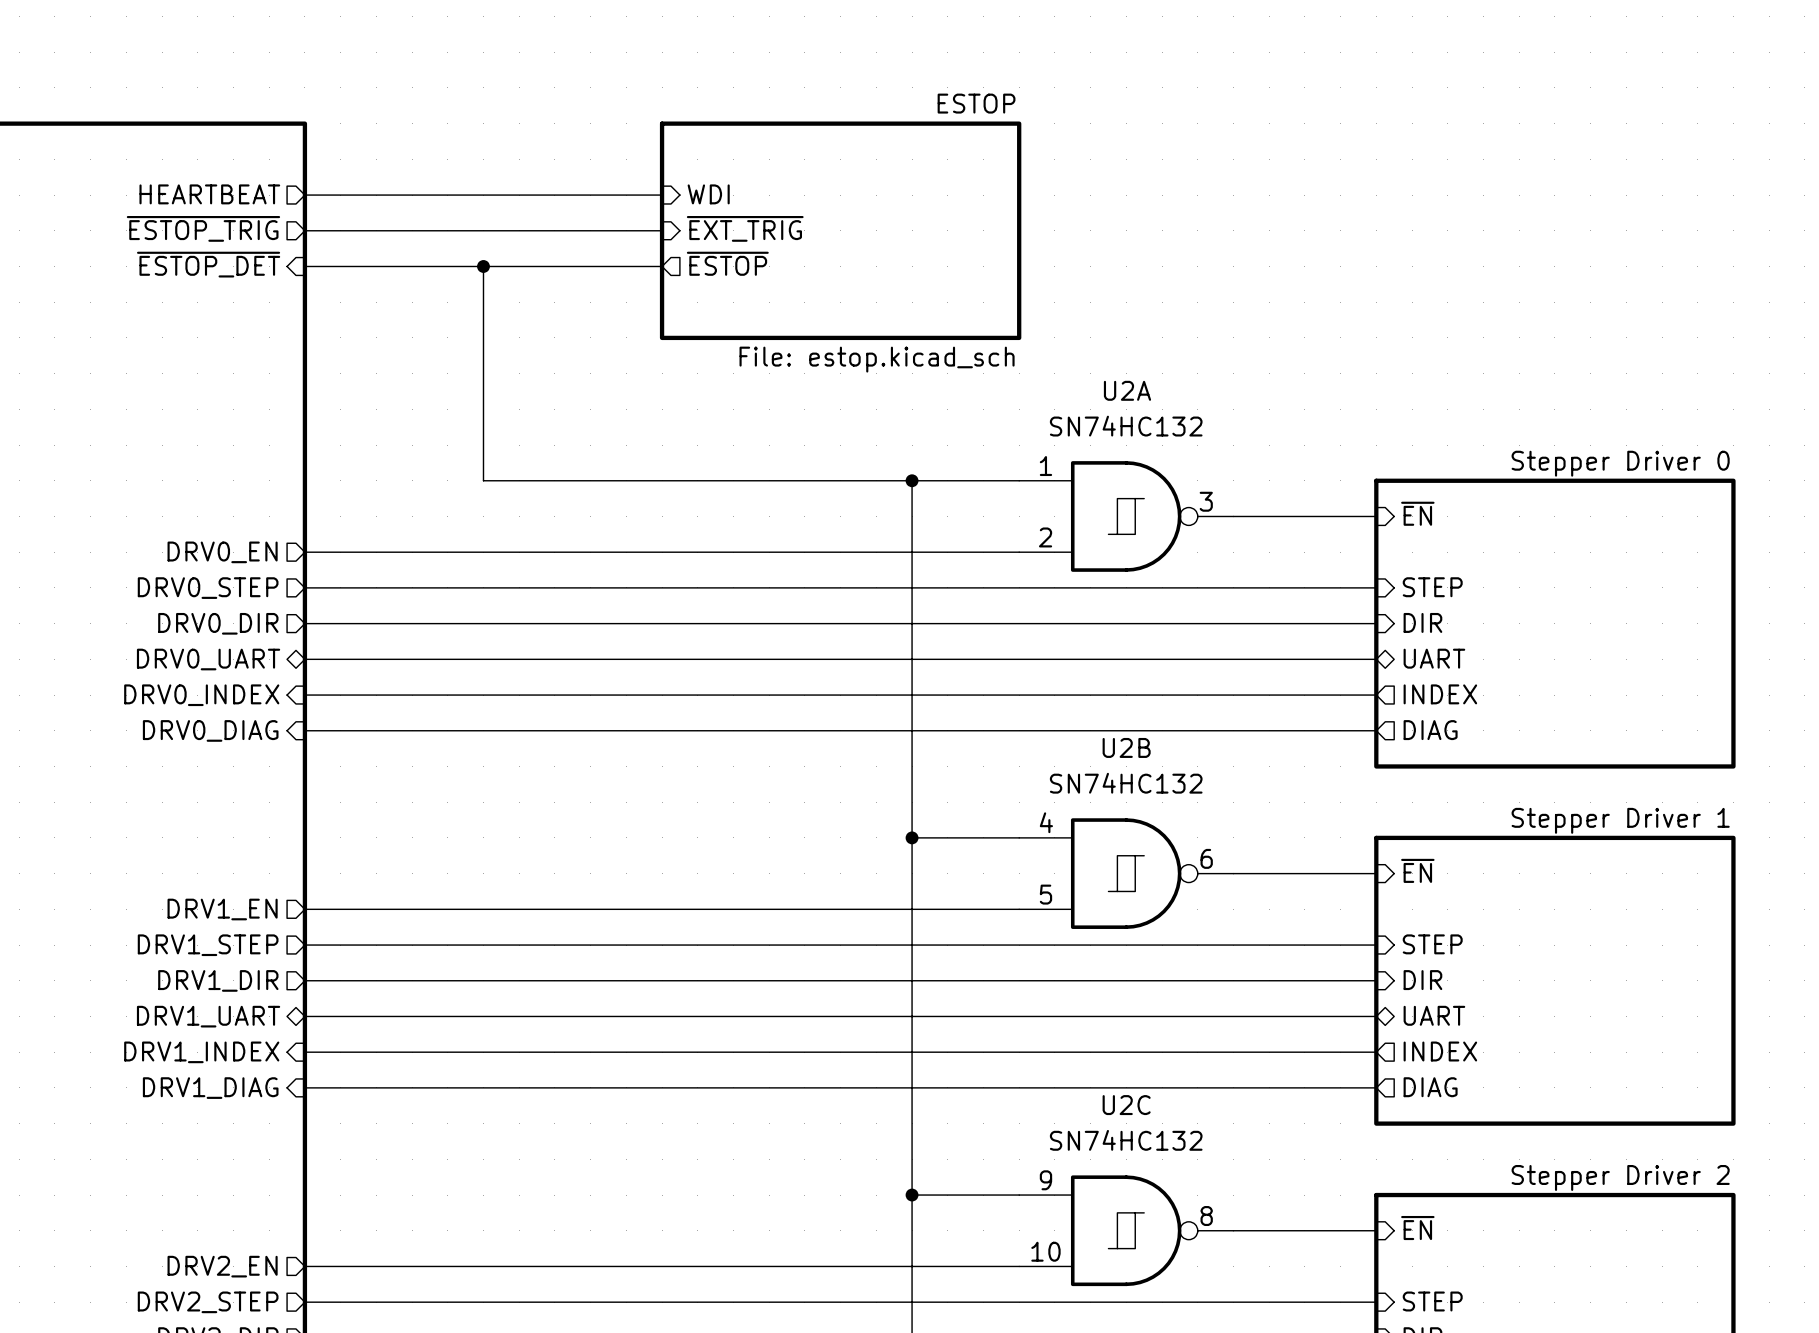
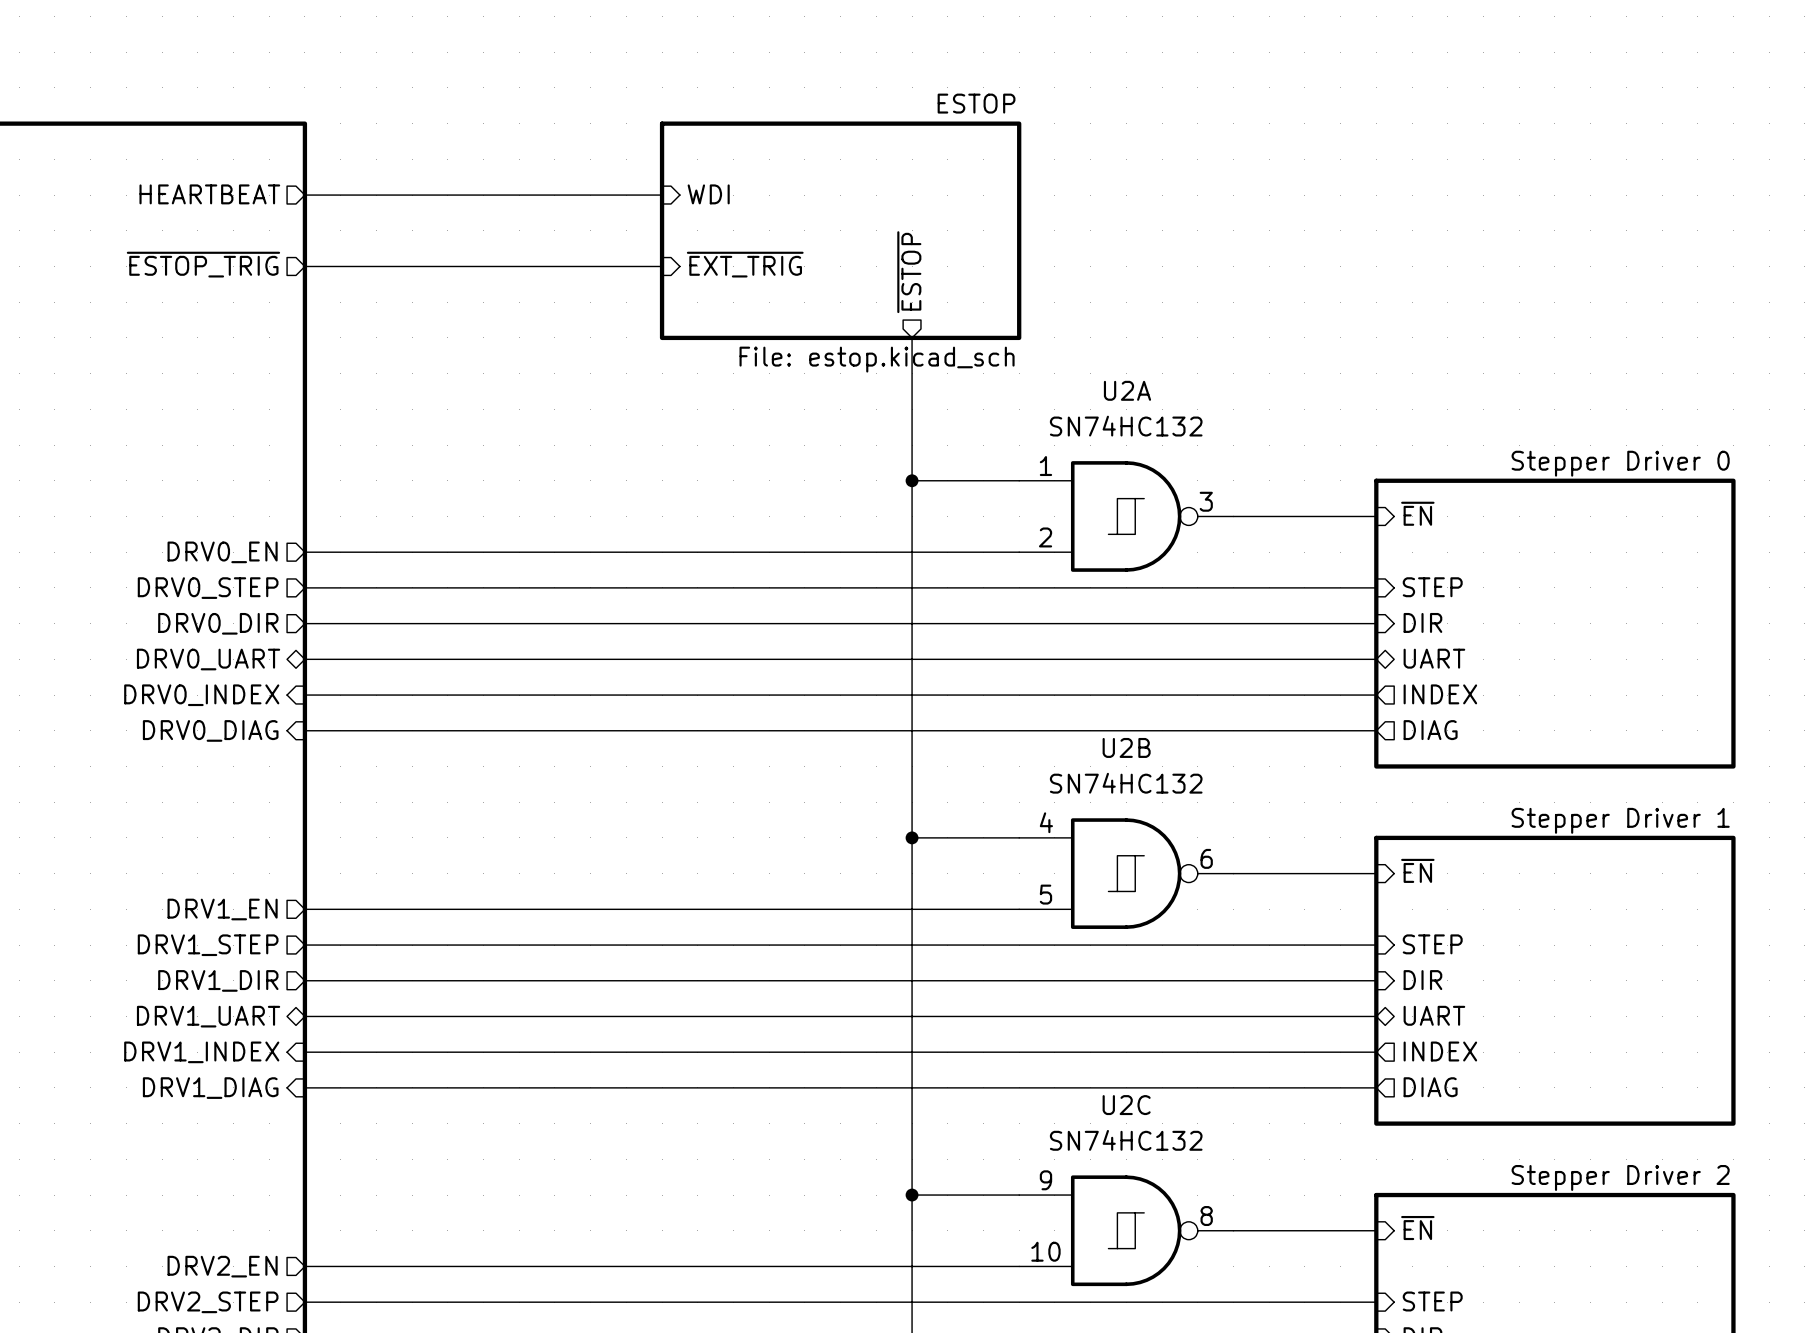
sheet pin: ~{ESTOP_TRIG} (203, 228) -> none
sheet pin: ~{EXT_TRIG} (745, 228) -> none
wire: (304, 230) (662, 230) -> none
sheet pin shape: output (727, 263) -> input (745, 264)
sheet pin: ~{ESTOP} (727, 263) -> ~{EXT_TRIG} (745, 264)
sheet pin shape: input (208, 264) -> output (203, 264)
sheet pin: ~{ESTOP_DET} (208, 264) -> ~{ESTOP_TRIG} (203, 264)
wire: (483, 266) (483, 480) (912, 480) -> (912, 337) (912, 480)
junction: (483, 266) -> none
sheet pin: none -> ~{ESTOP} (909, 272)

